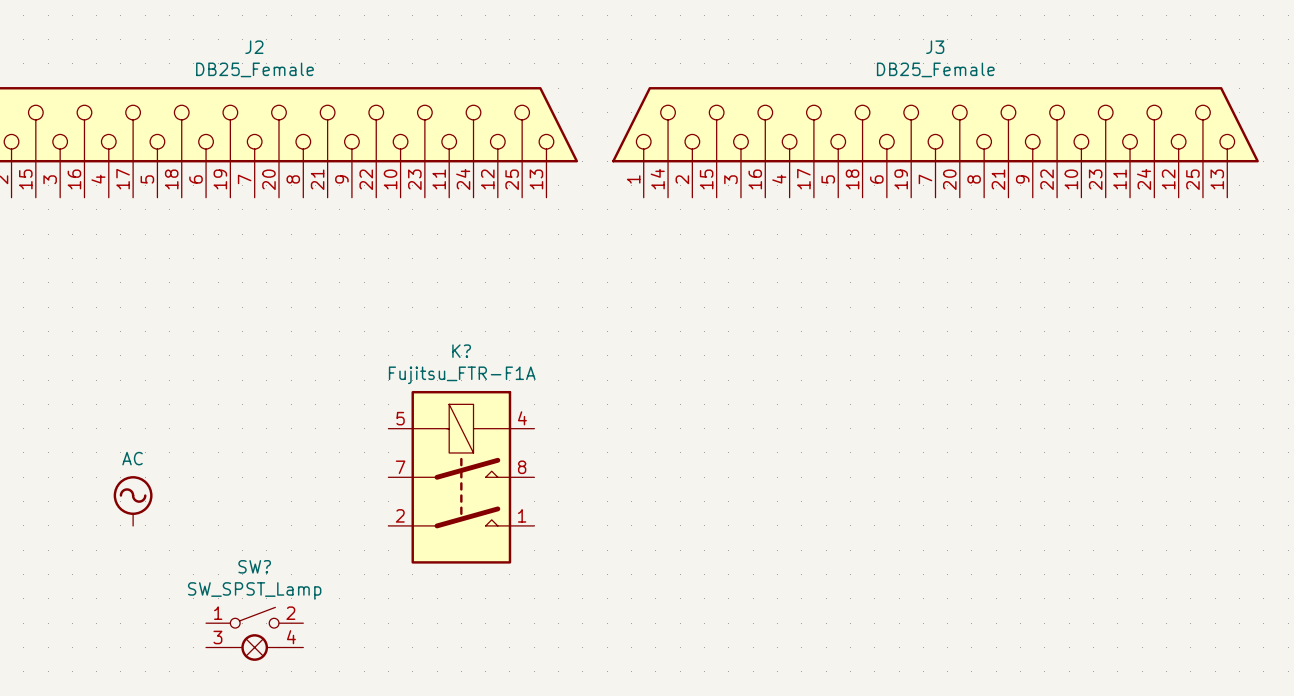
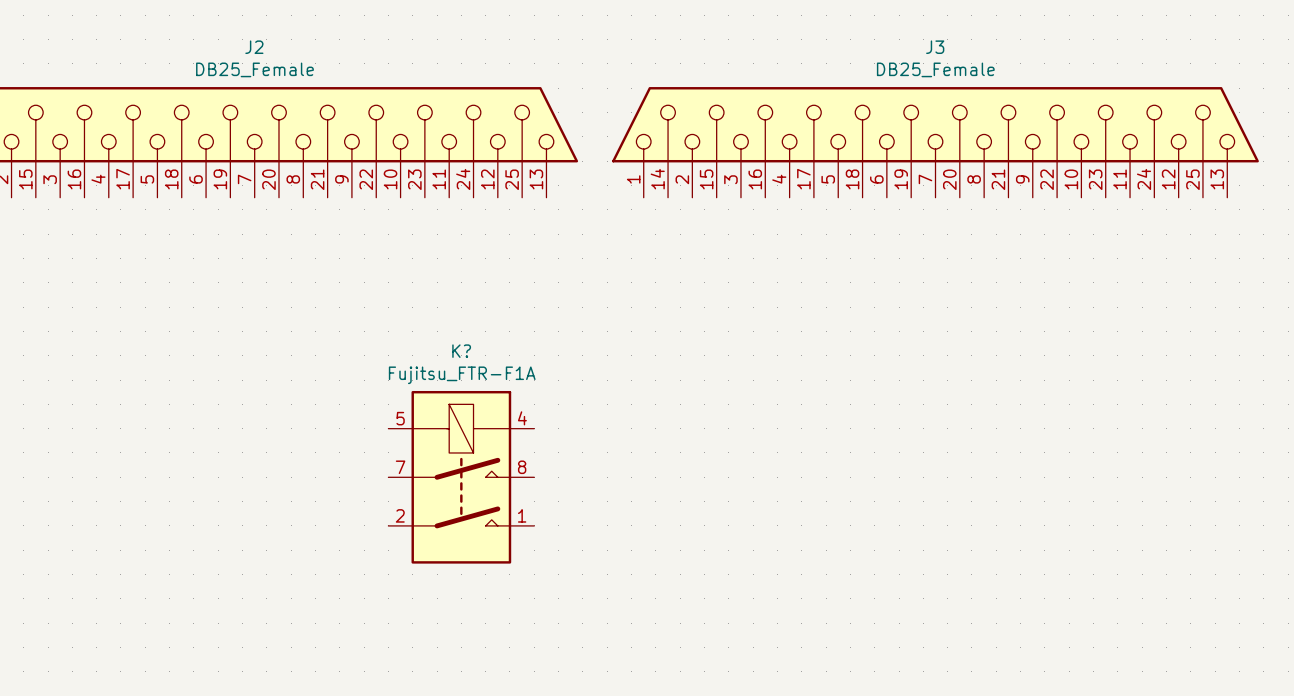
power symbol: AC (133, 501) -> none
SW?: SW_SPST_Lamp (254, 634) -> none

